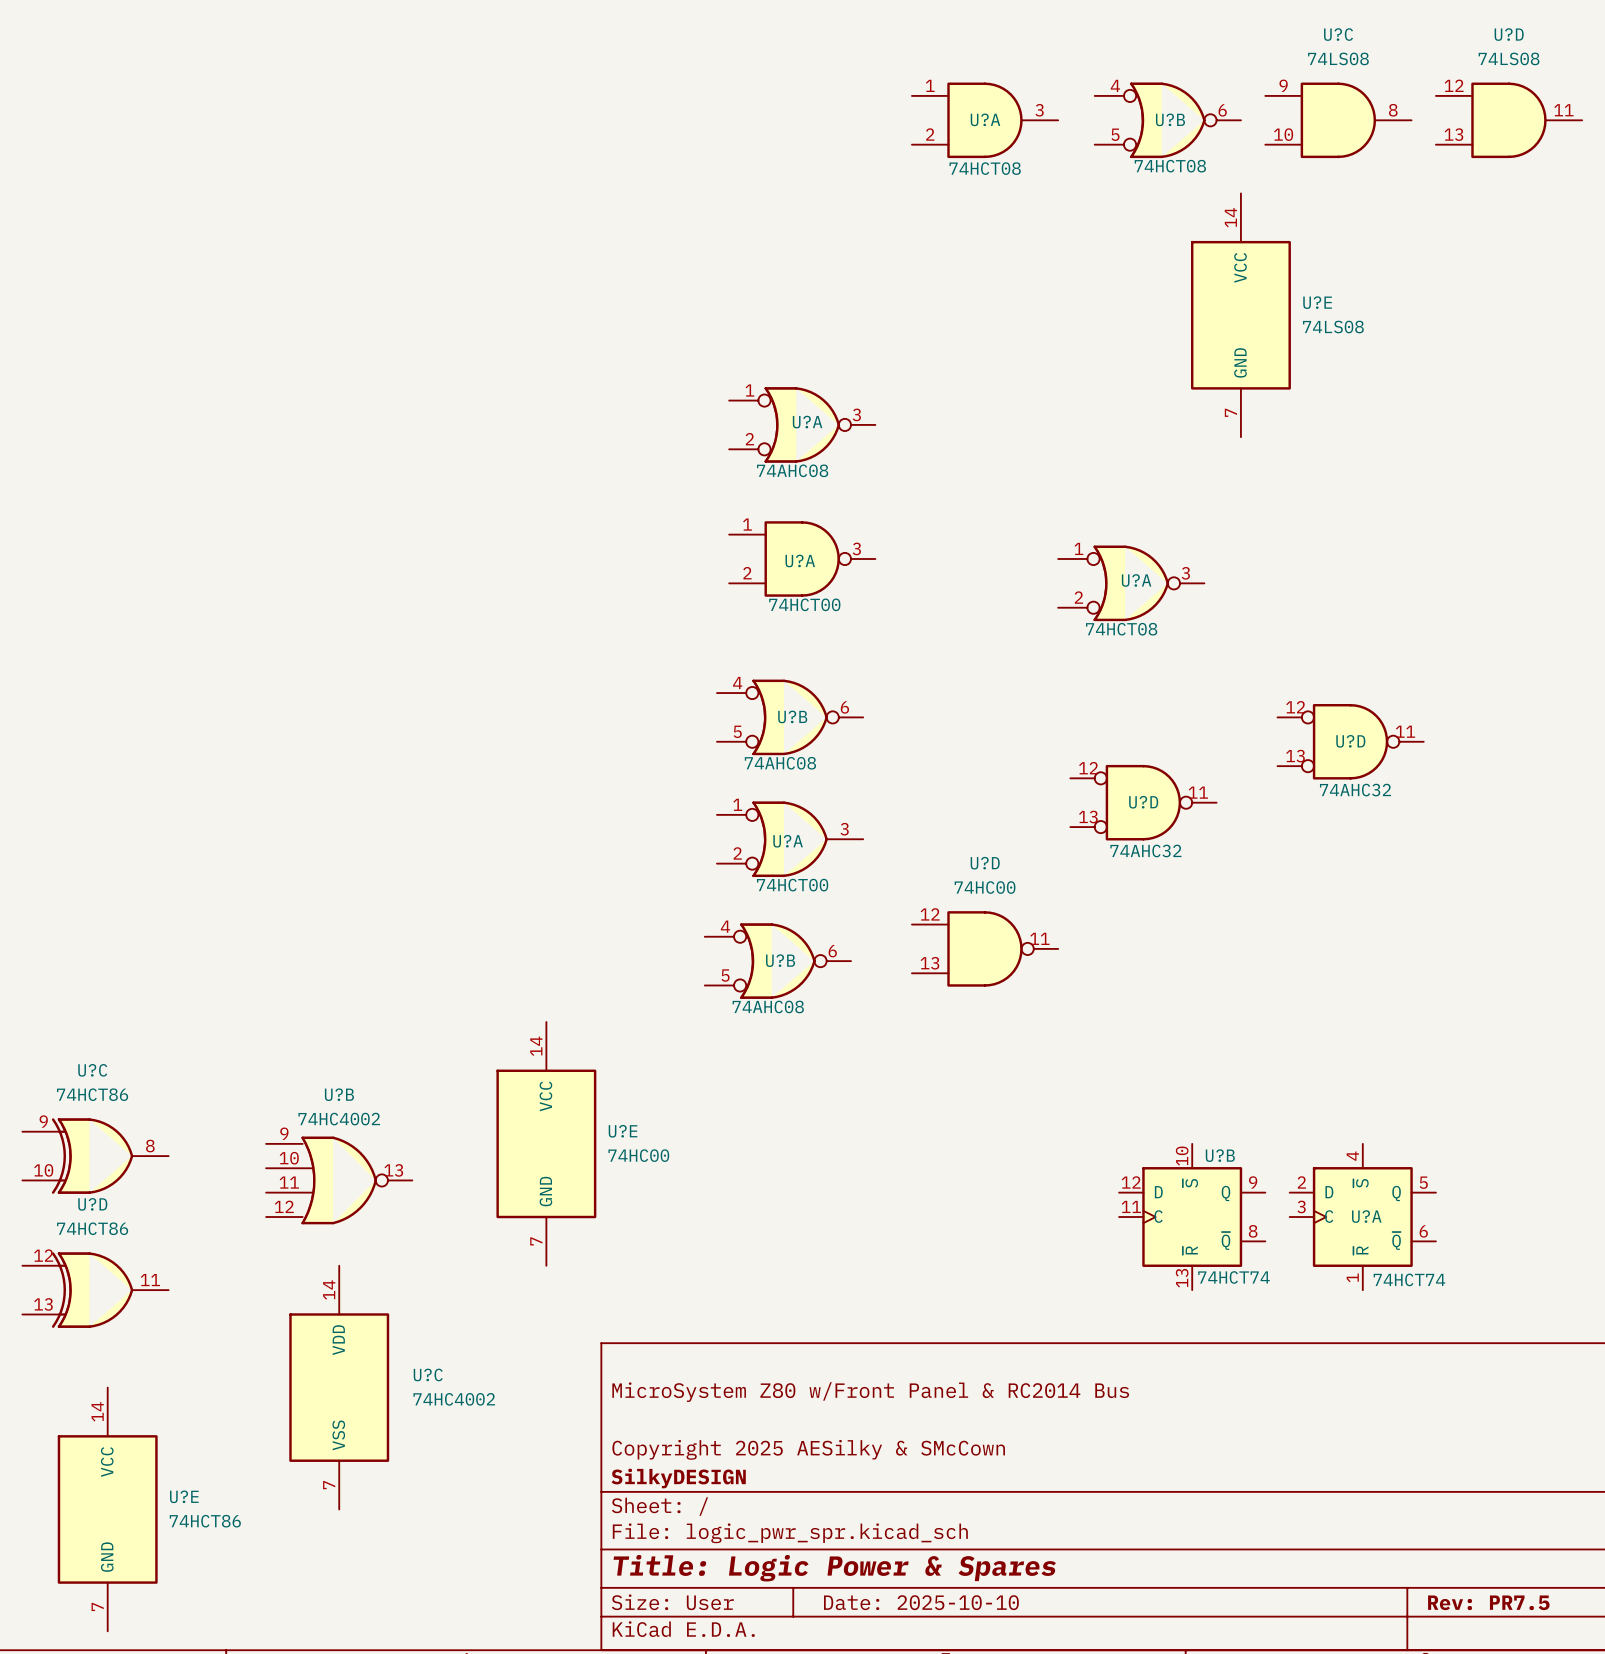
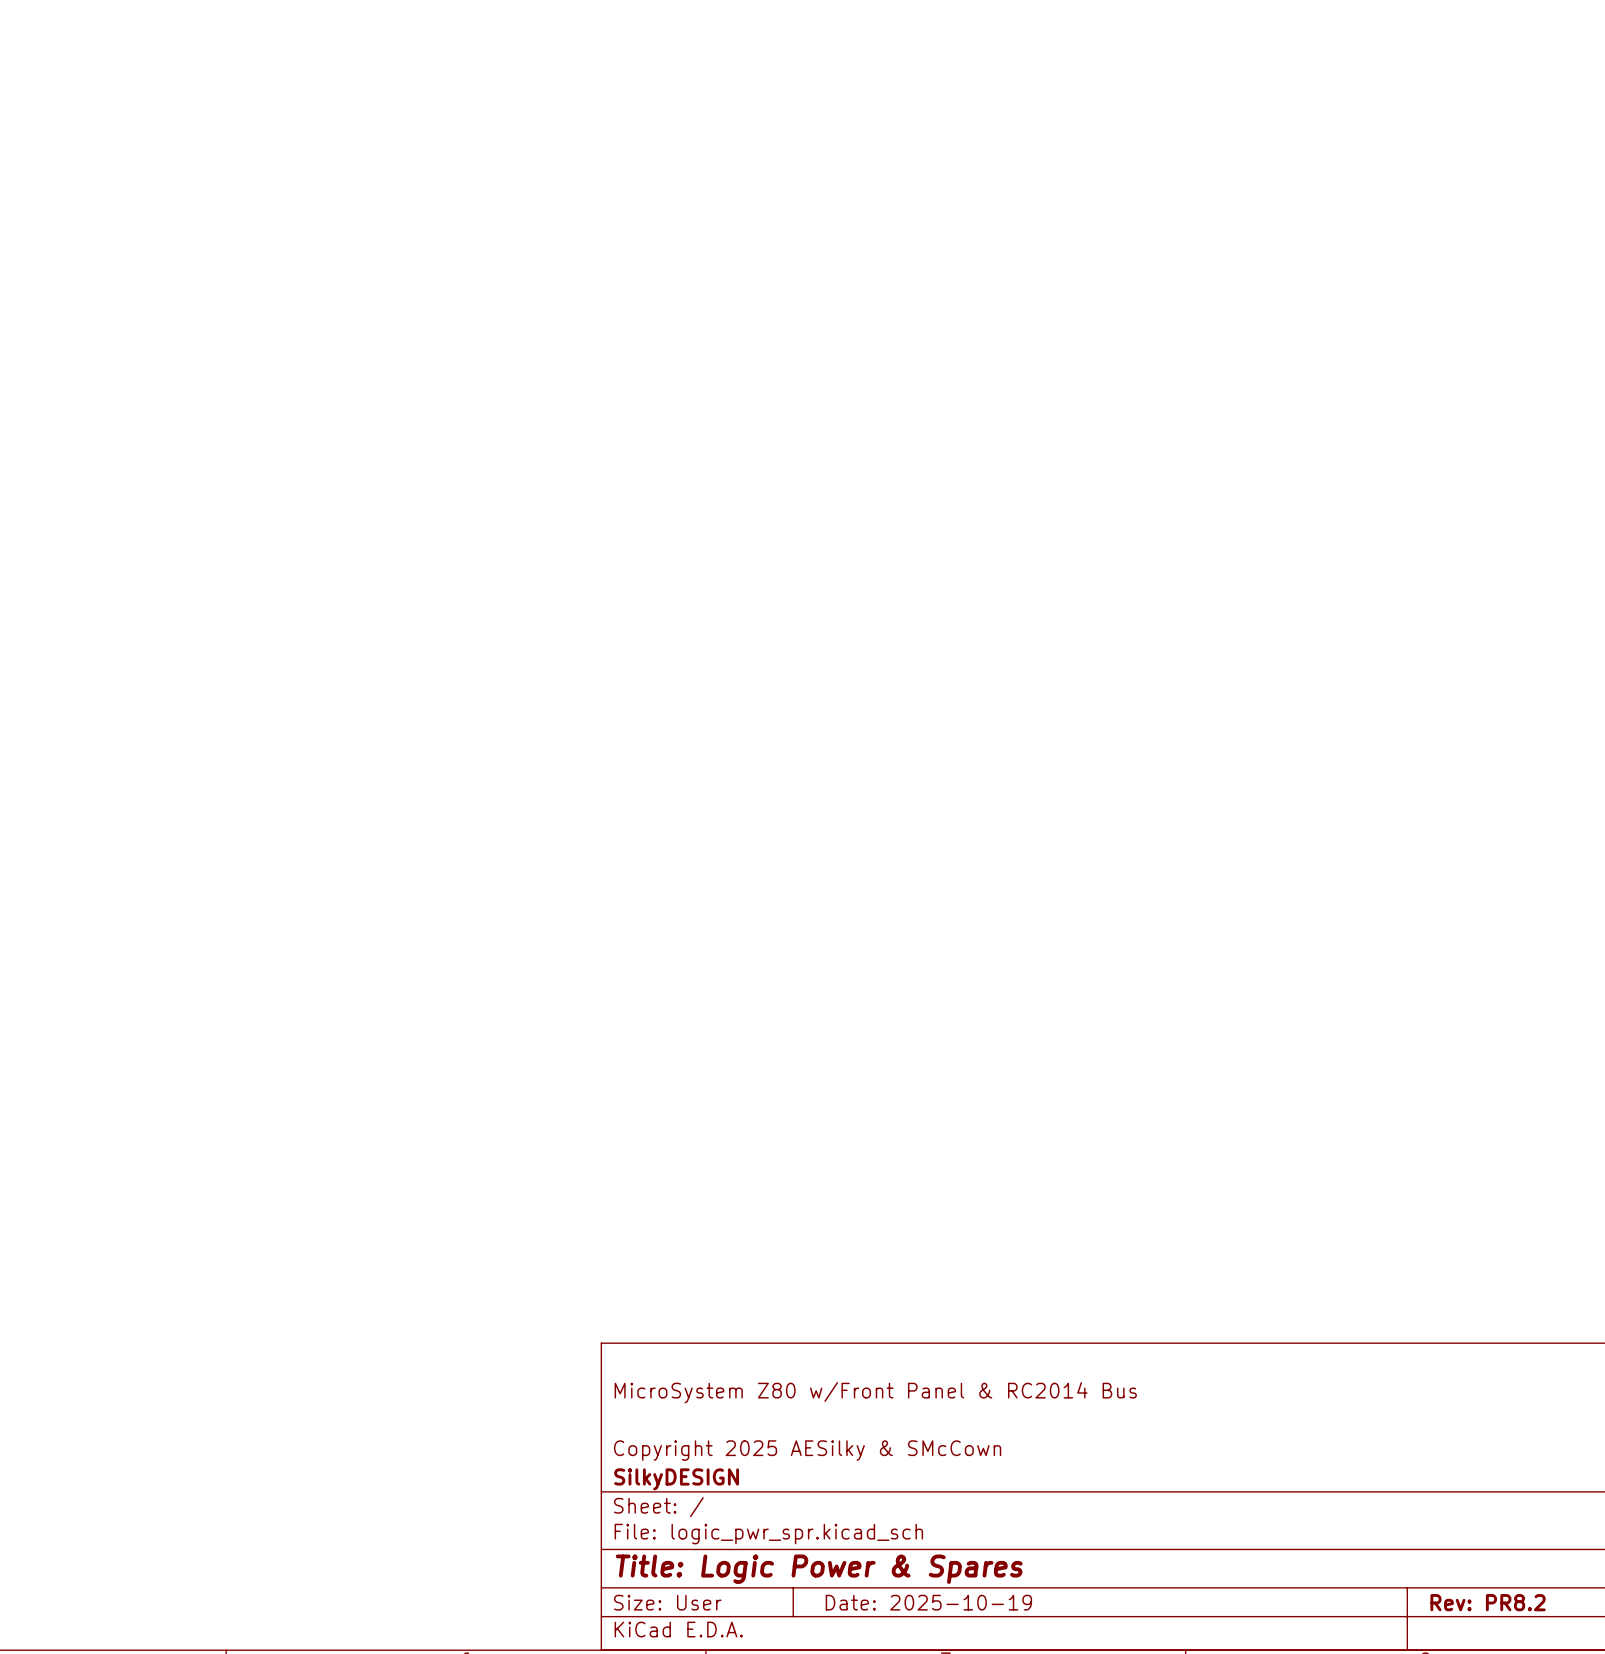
U?A: 74HCT08 (985, 120) -> none
U?B: 74HCT08 (1167, 120) -> none
U?C: 74LS08 (1338, 120) -> none
U?D: 74LS08 (1509, 120) -> none
U?E: 74LS08 (1240, 315) -> none
U?A: 74AHC08 (802, 424) -> none
U?A: 74HCT00 (802, 558) -> none
U?A: 74HCT08 (1131, 583) -> none
U?B: 74AHC08 (790, 717) -> none
U?D: 74AHC32 (1350, 741) -> none
U?D: 74AHC32 (1143, 802) -> none
U?A: 74HCT00 (790, 839) -> none
U?D: 74HC00 (985, 948) -> none
U?B: 74AHC08 (777, 961) -> none
U?E: 74HC00 (546, 1143) -> none
U?C: 74HCT86 (95, 1156) -> none
U?B: 74HC4002 (339, 1180) -> none
U?B: 74HCT74 (1192, 1217) -> none
U?A: 74HCT74 (1362, 1217) -> none
U?D: 74HCT86 (95, 1290) -> none
U?C: 74HC4002 (339, 1387) -> none
U?E: 74HCT86 (107, 1509) -> none
title block: Date: 2025-10-10 (921, 1602) -> Date: 2025-10-19 (928, 1602)
title block: Rev: PR7.5 (1488, 1602) -> Rev: PR8.2 (1488, 1602)

